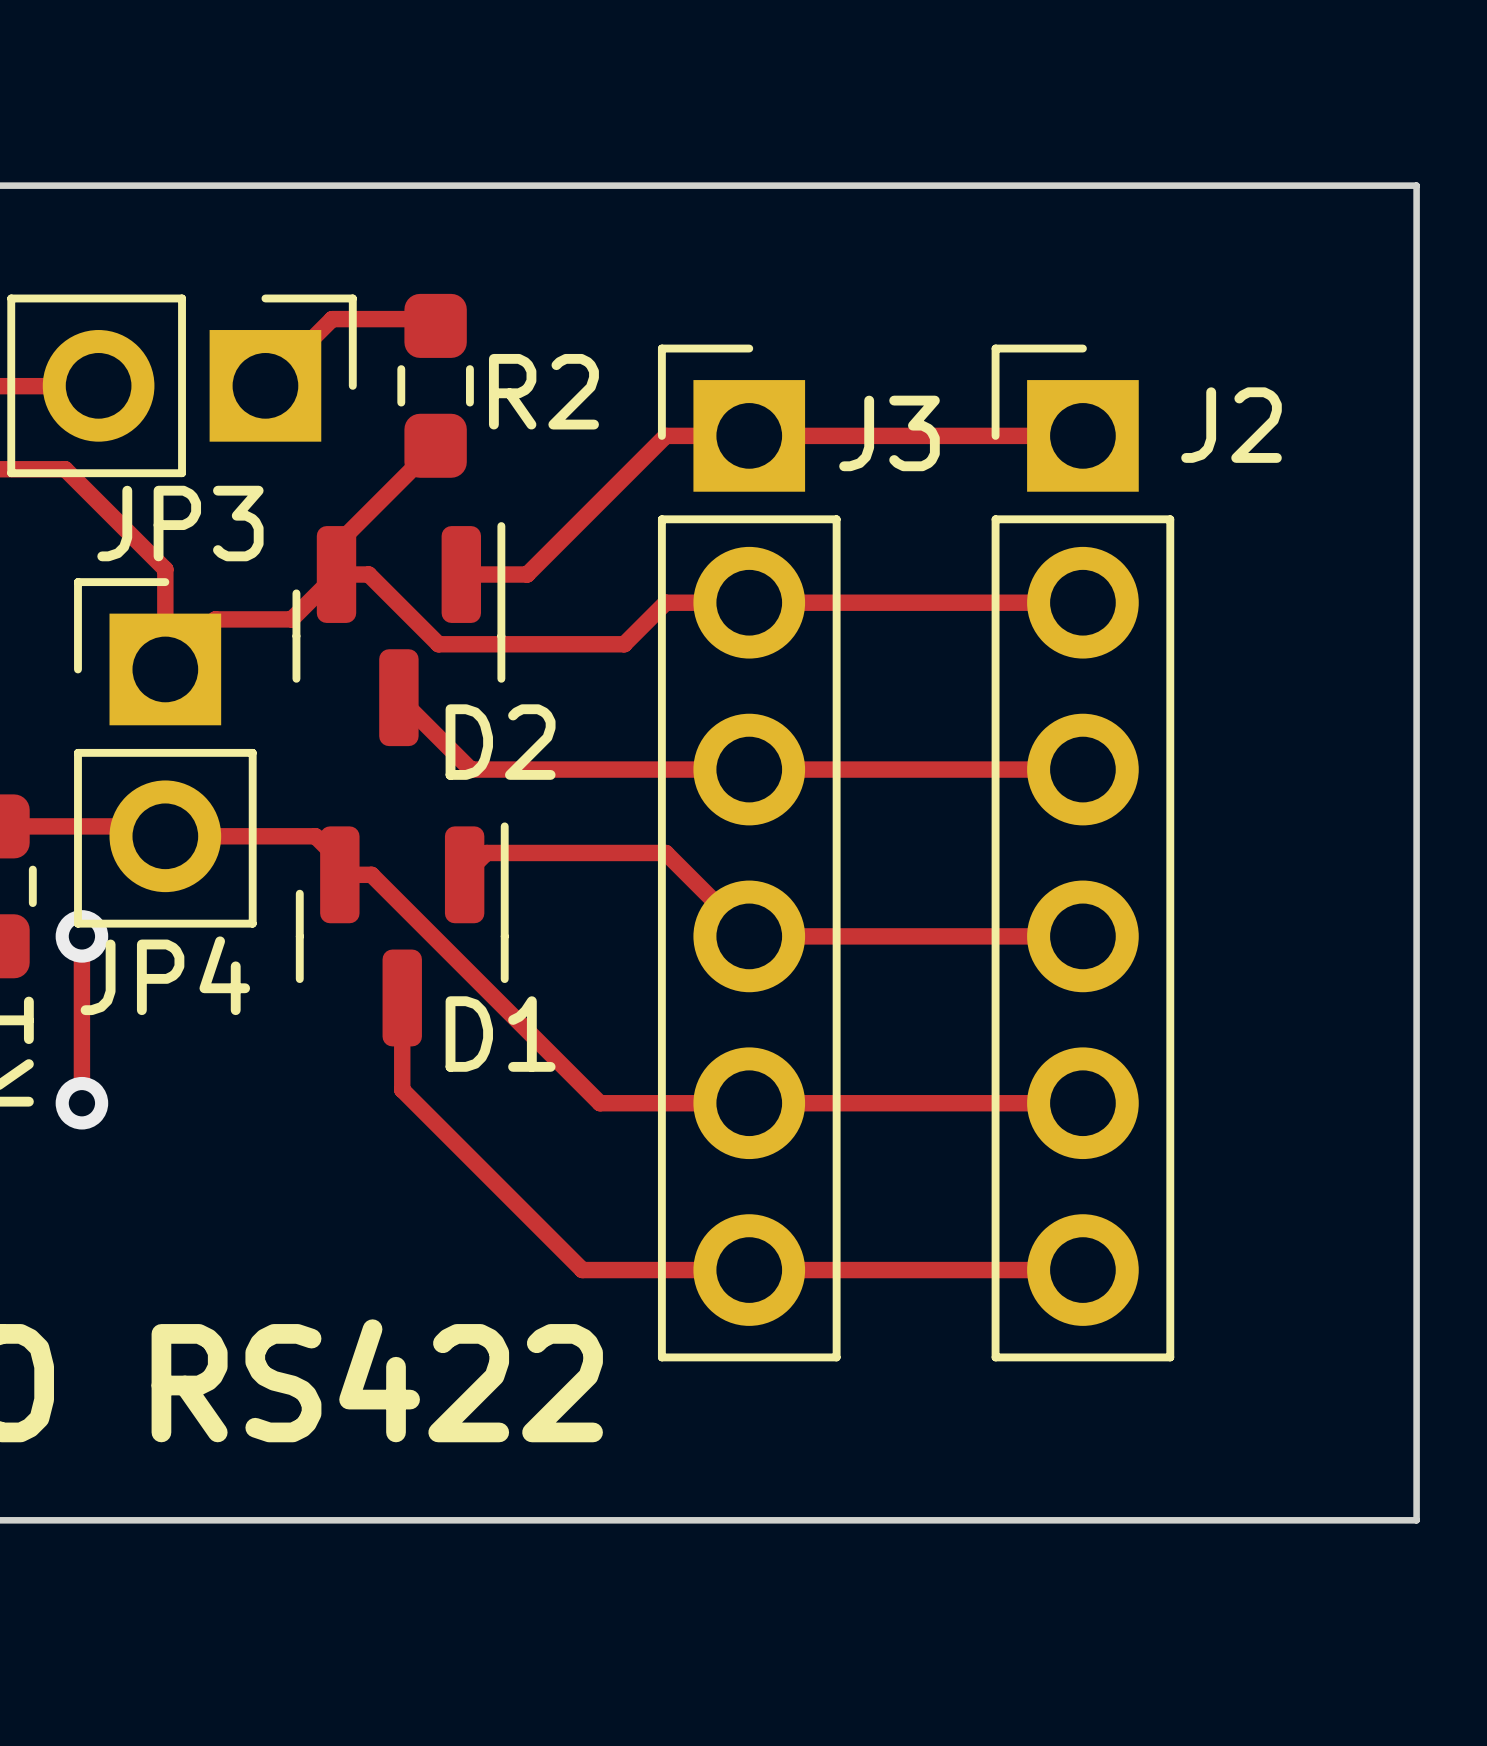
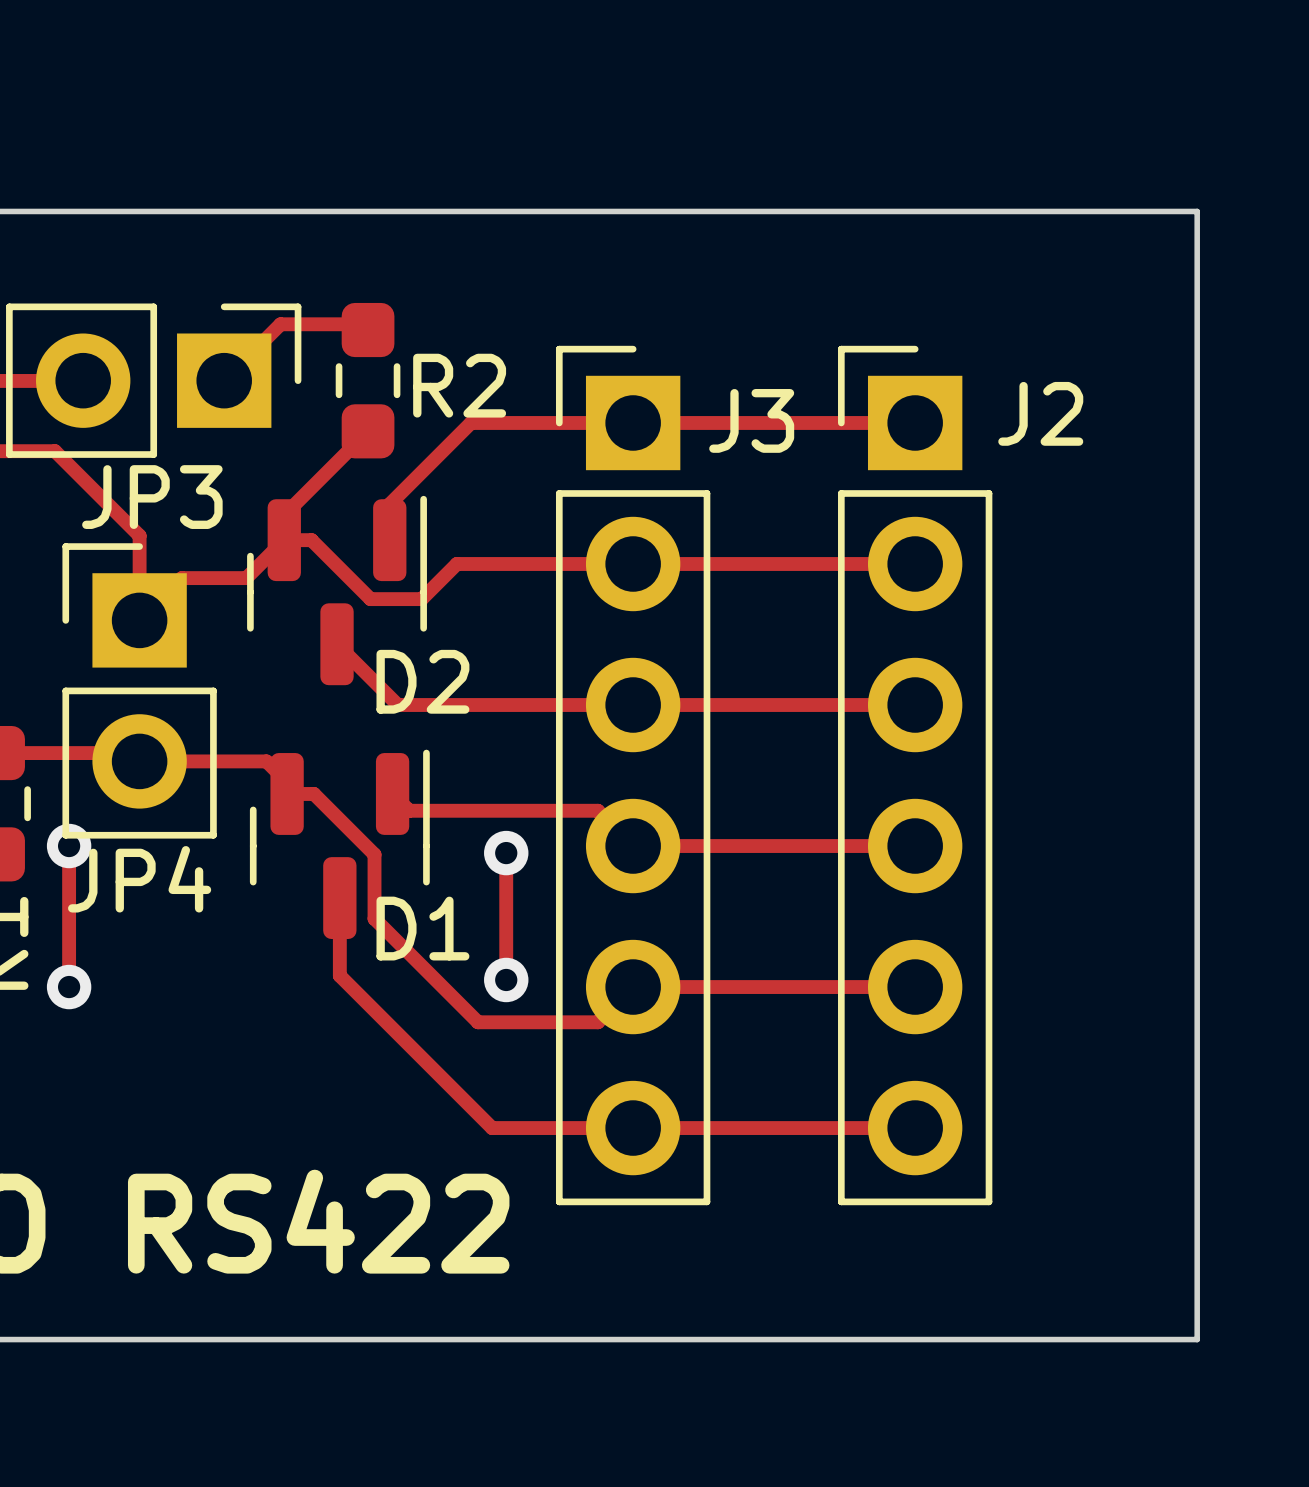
track: (665, 435) (527, 574) (461, 574) -> (562, 422) (470, 422) (389, 504) (389, 540)
track: (665, 602) (624, 644) (499, 644) -> (562, 564) (456, 564) (421, 599)
track: (464, 874) (486, 852) (665, 852) (707, 894) -> (392, 793) (409, 810) (597, 810)
track: none -> (506, 853) (506, 979)
via: none -> (506, 853)
track: (443, 946) (600, 1103) (749, 1103) -> (374, 854) (374, 918) (478, 1022) (597, 1022) (633, 987)
via: none -> (506, 979)

